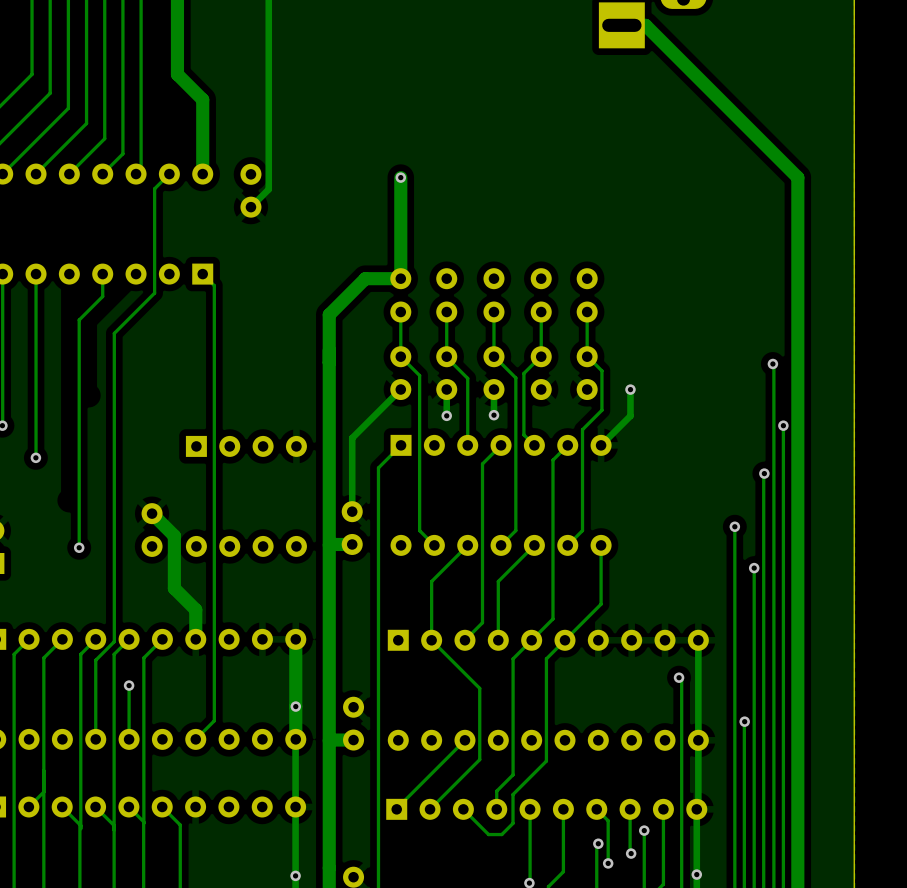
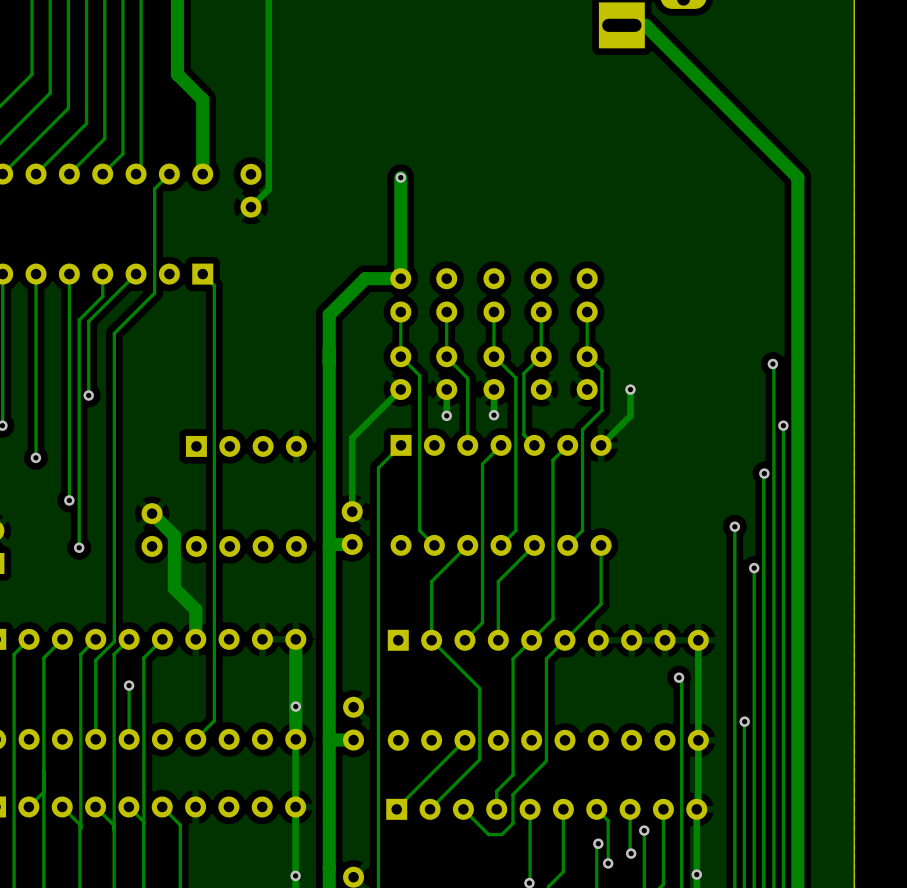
track: none -> (69, 274) (69, 500)
track: none -> (136, 274) (88, 321) (88, 395)
via: none -> (88, 395)
via: none -> (69, 500)

